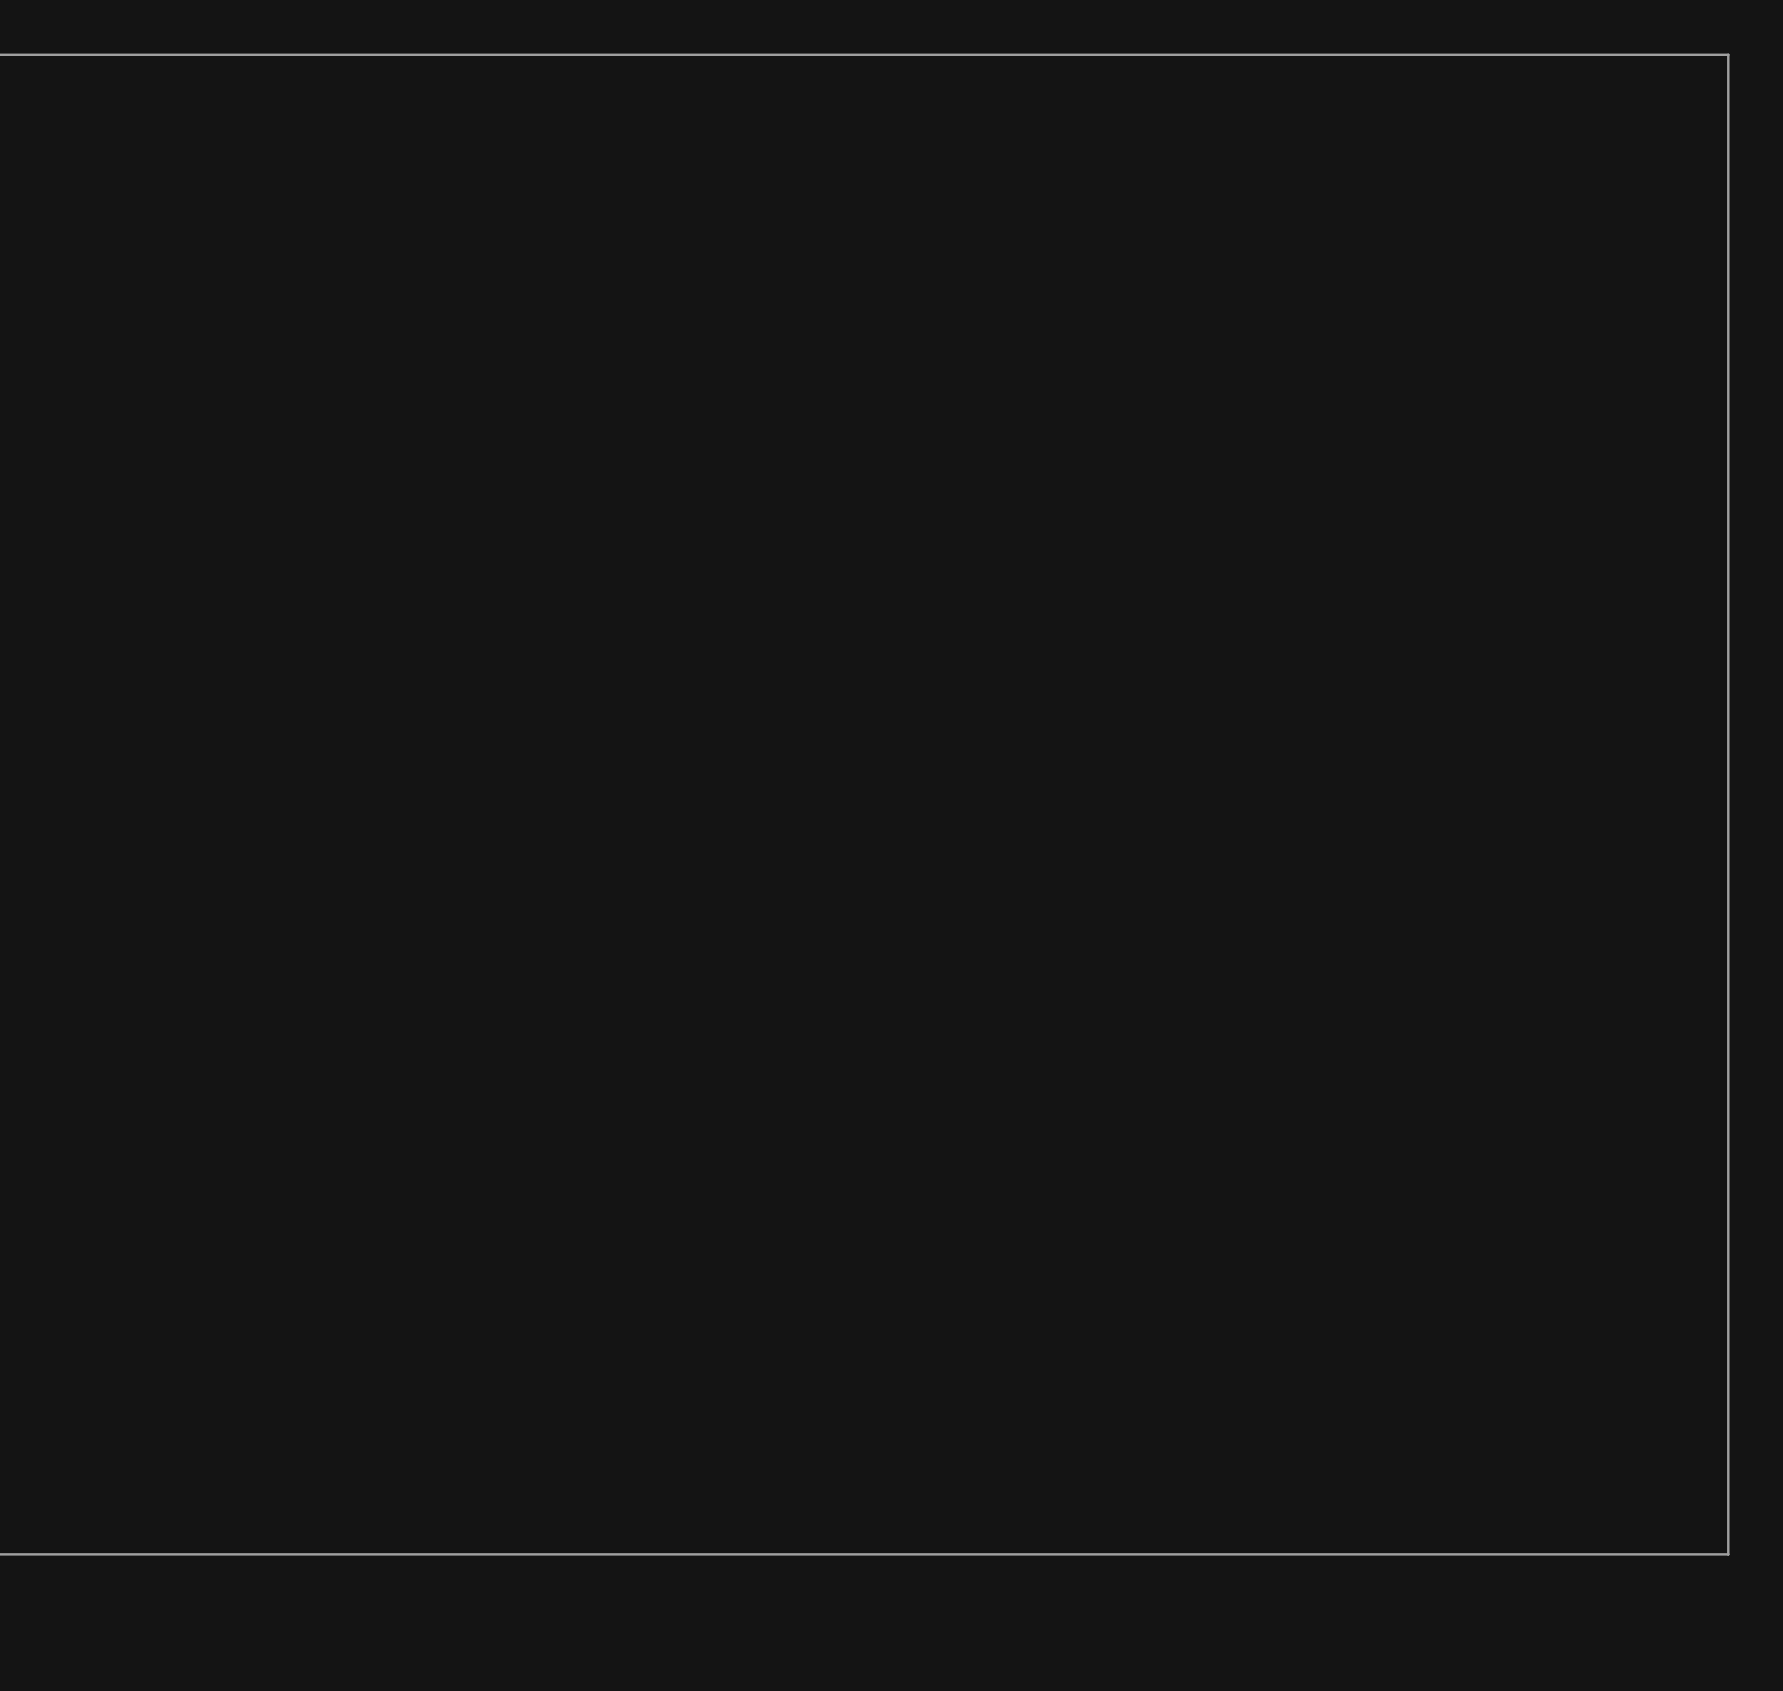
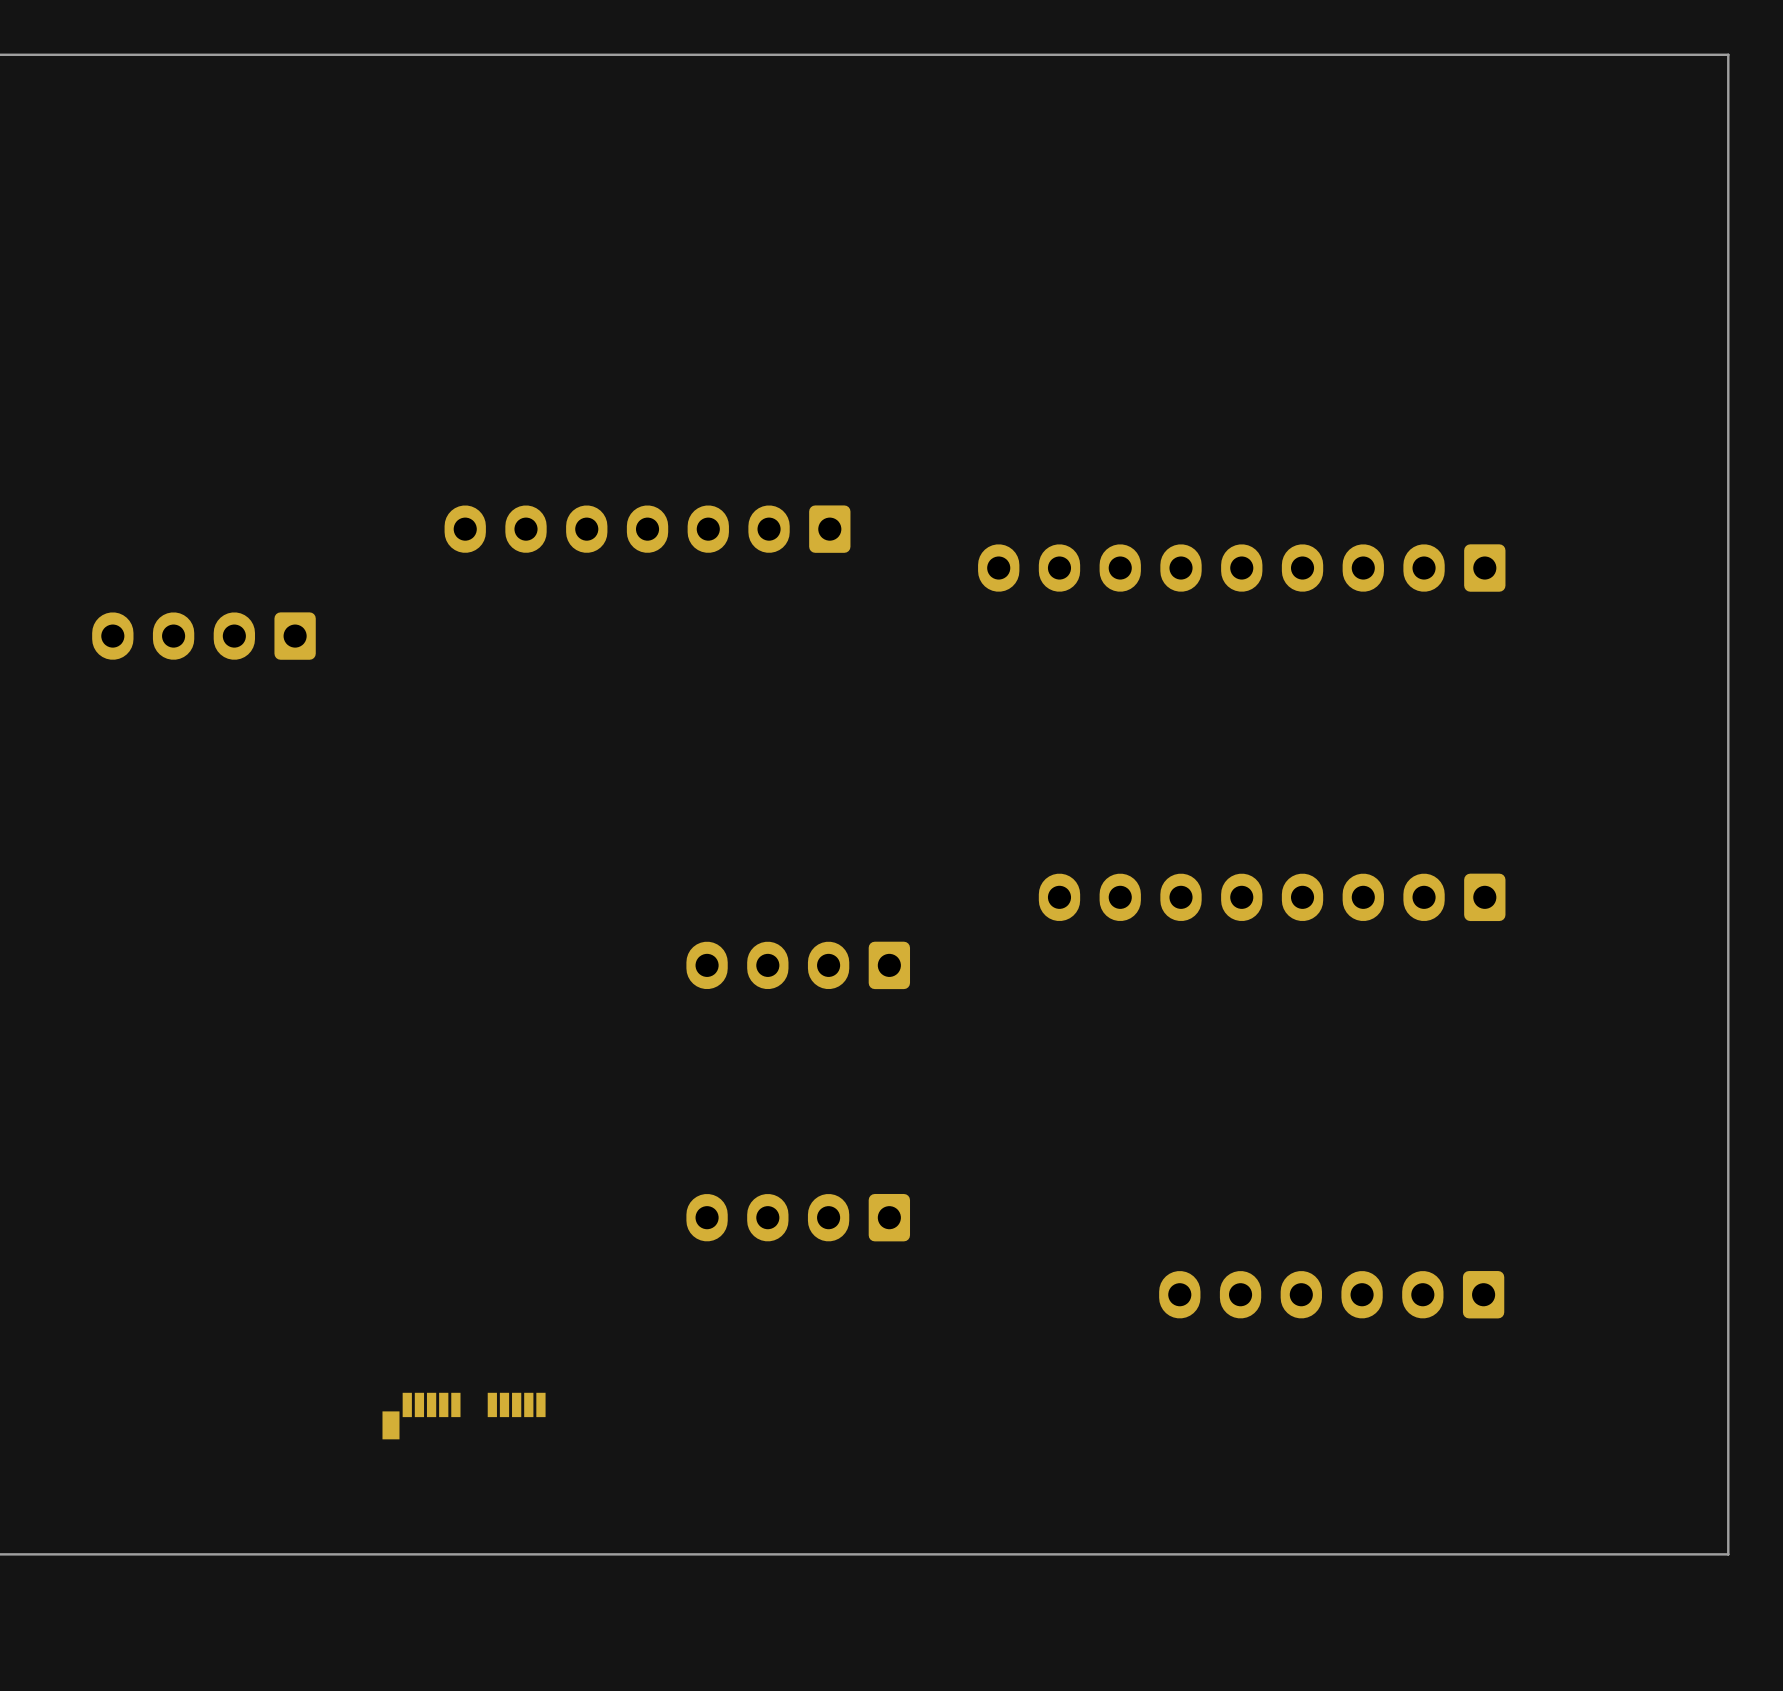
part: none -> (647, 529)
part: none -> (1241, 568)
part: none -> (203, 636)
part: none -> (1272, 897)
part: none -> (798, 965)
part: none -> (798, 1217)
part: none -> (1331, 1294)
part: none -> (464, 1416)

